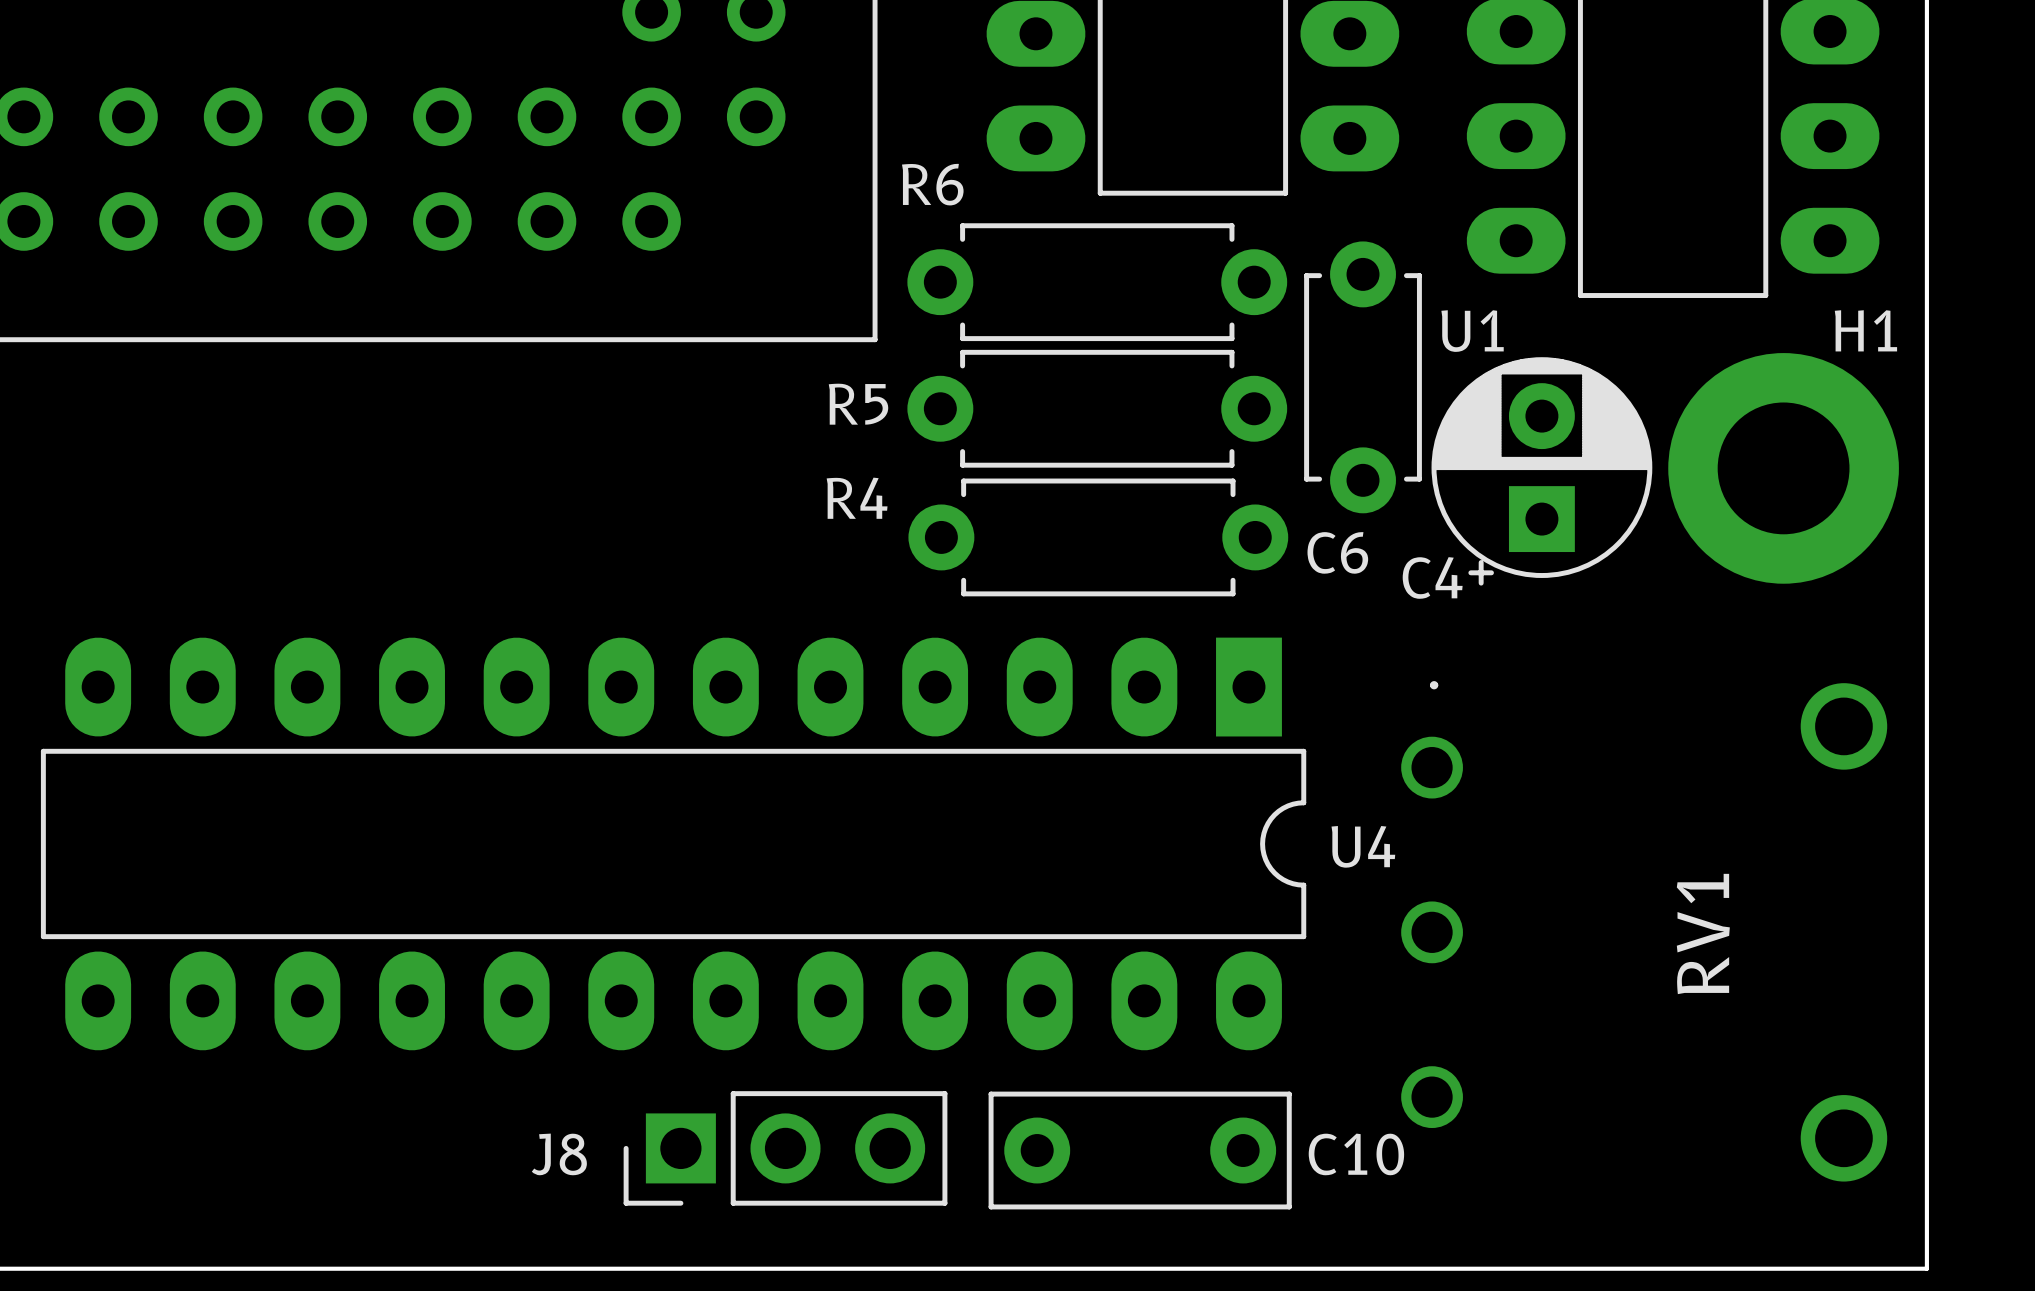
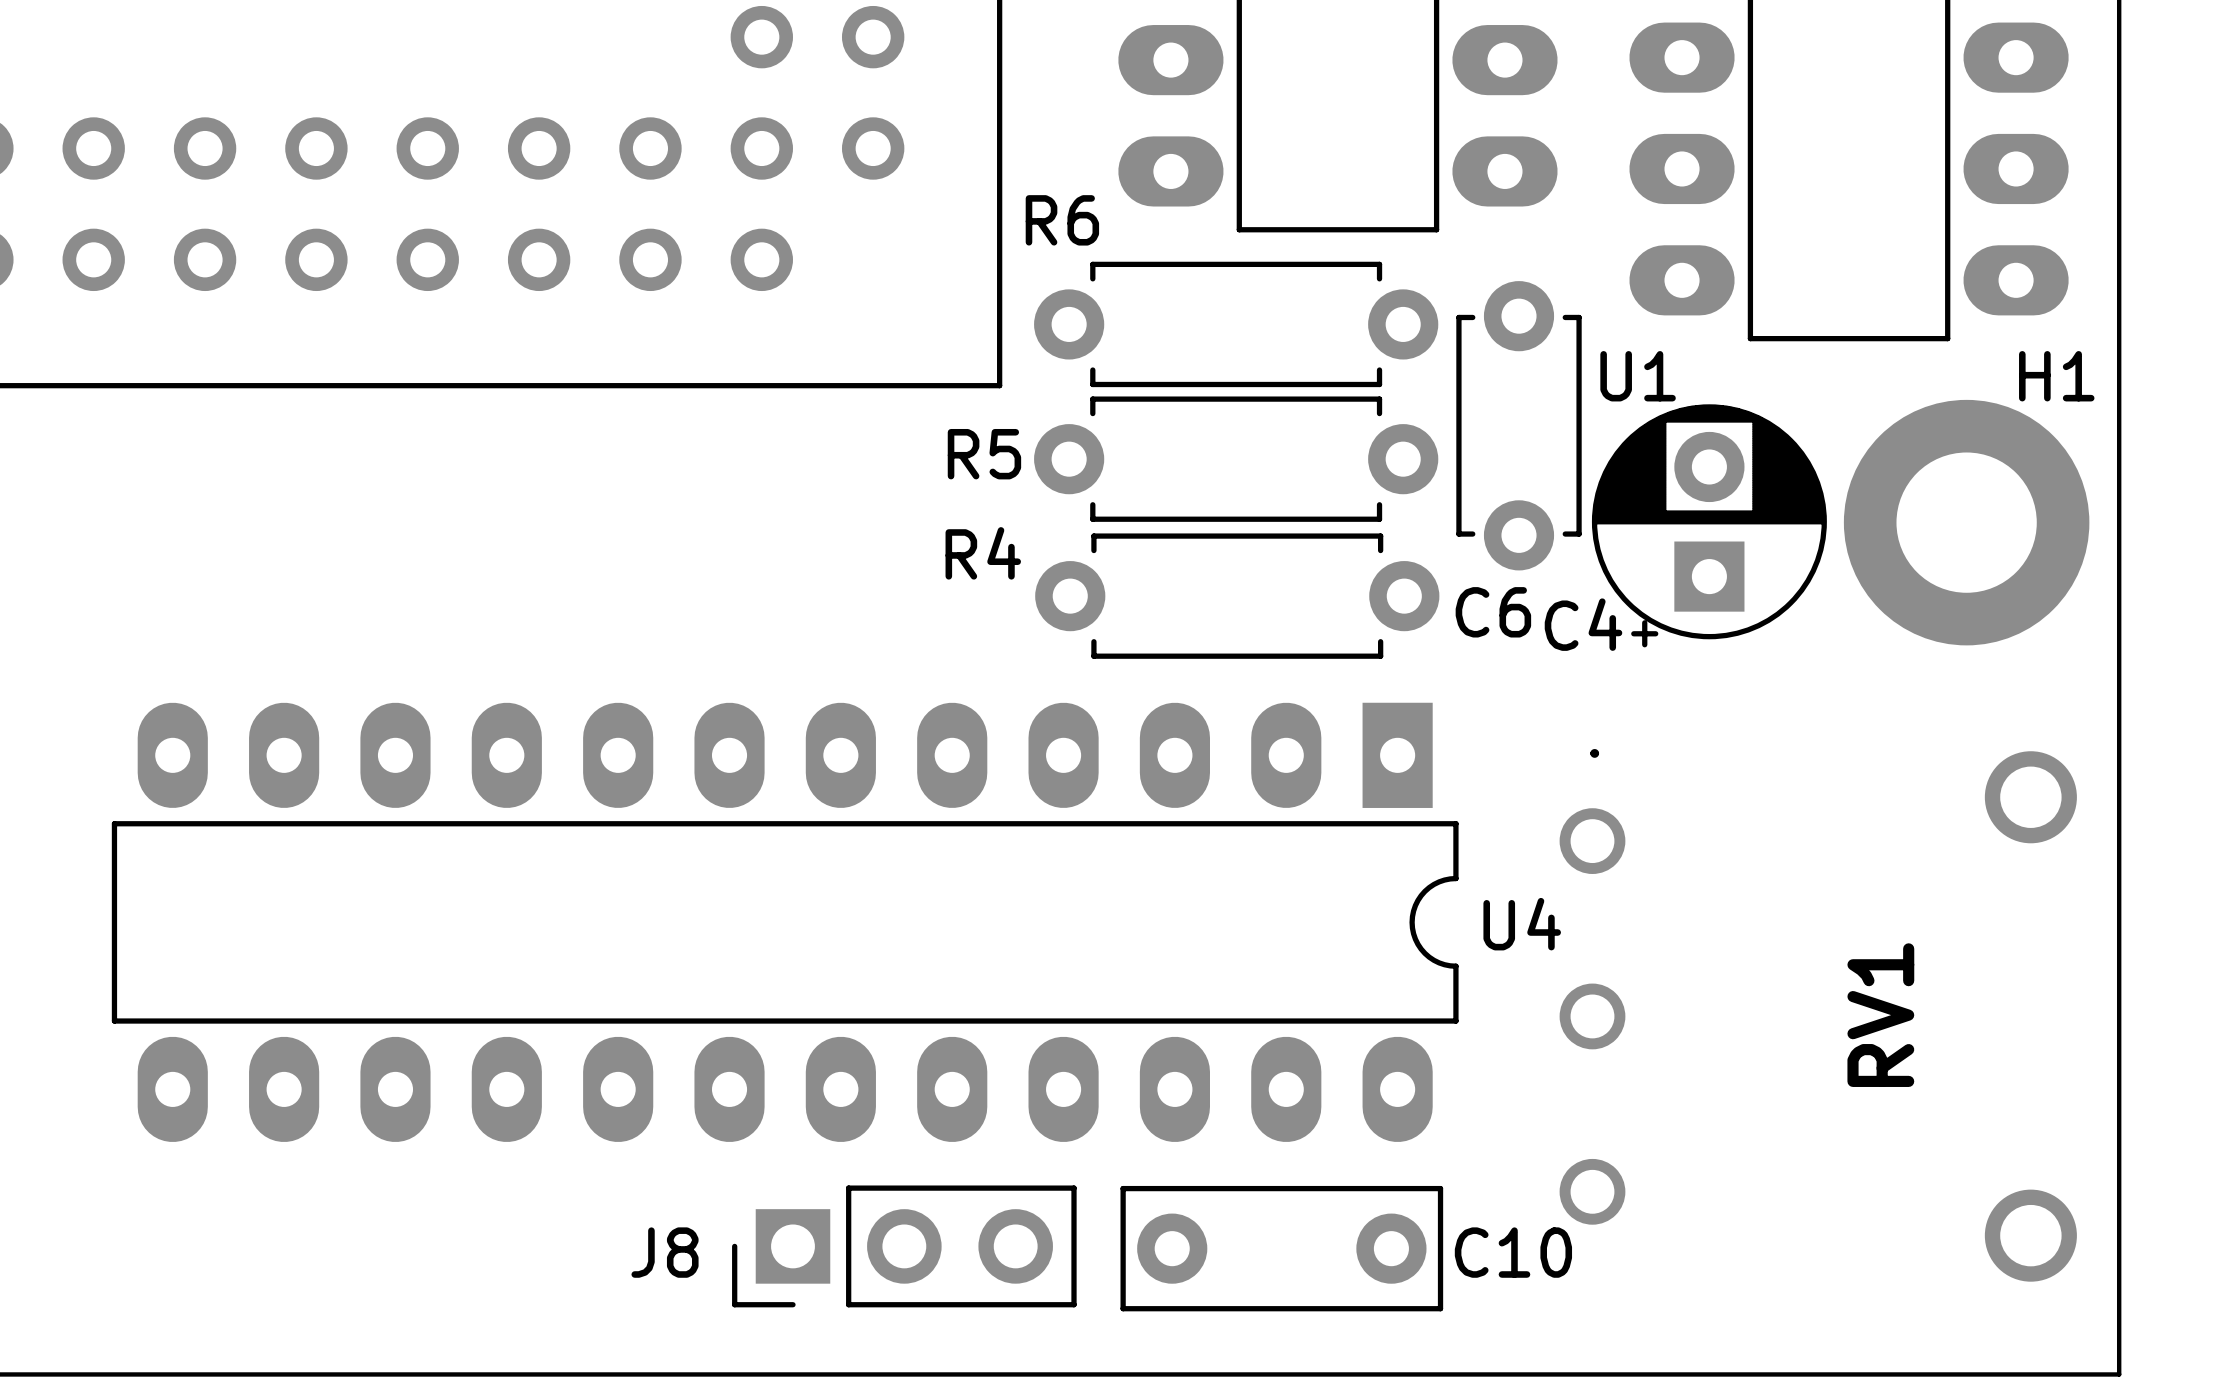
C4 name position: C4 (1432, 577) -> C4 (1583, 624)

